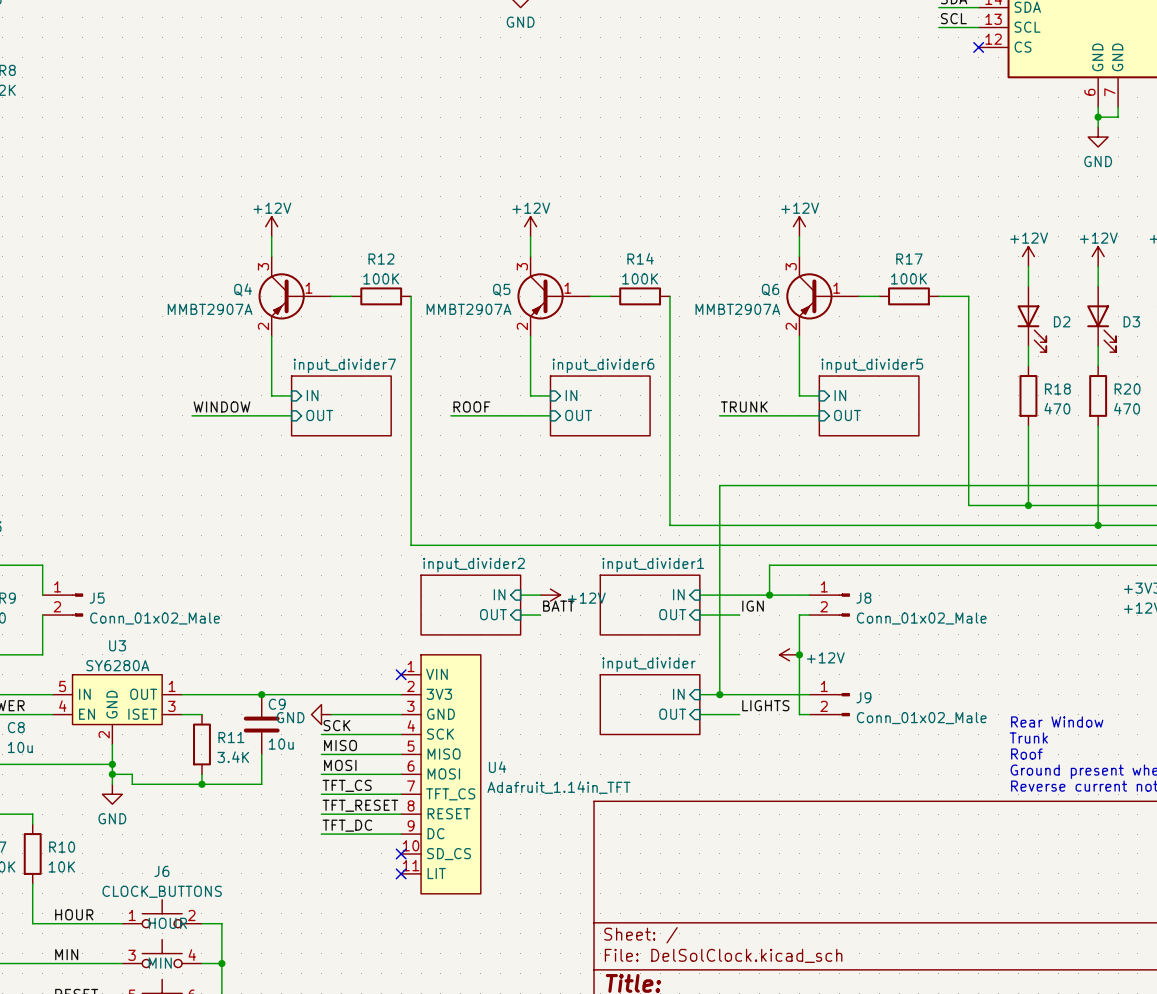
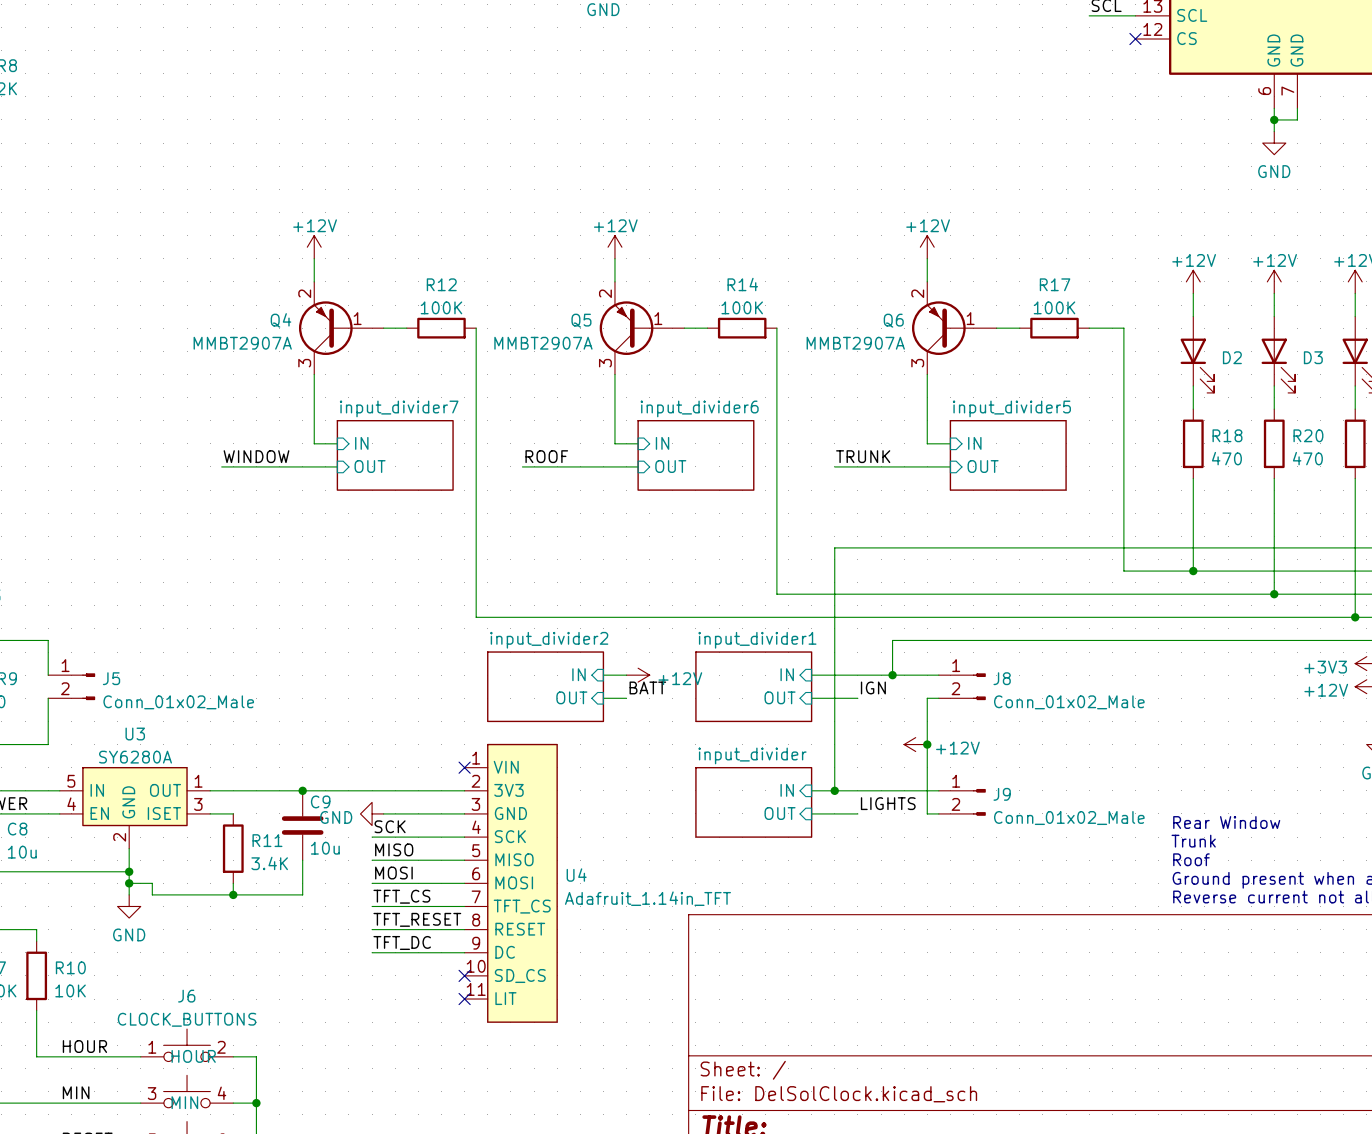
Q4 flip: as is (281, 296) -> up-down (325, 328)
Q5 flip: as is (540, 296) -> up-down (626, 328)
Q6 flip: as is (809, 296) -> up-down (938, 328)

